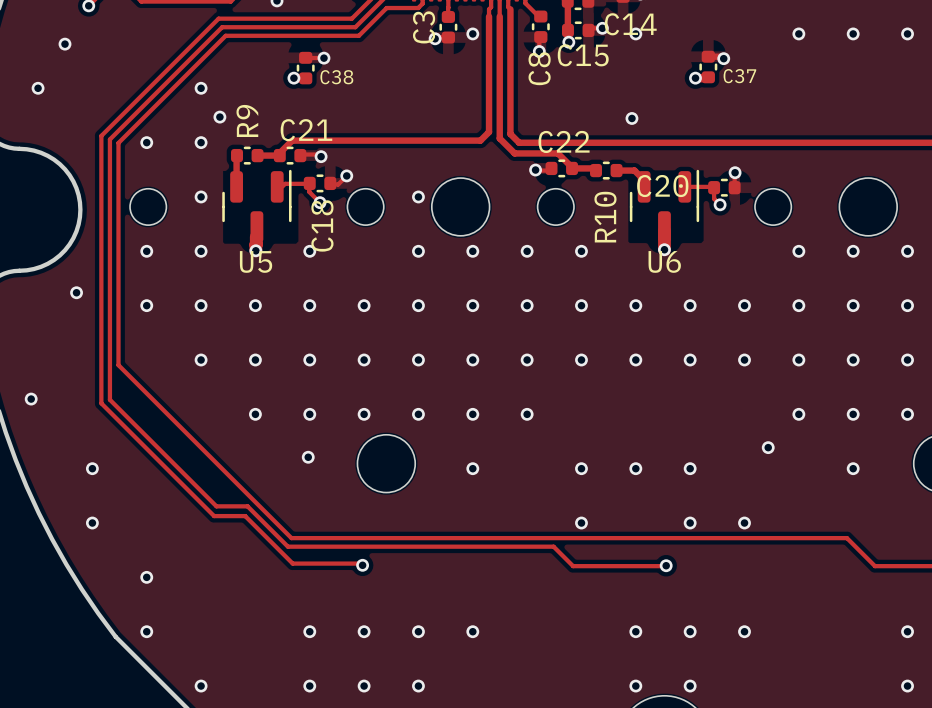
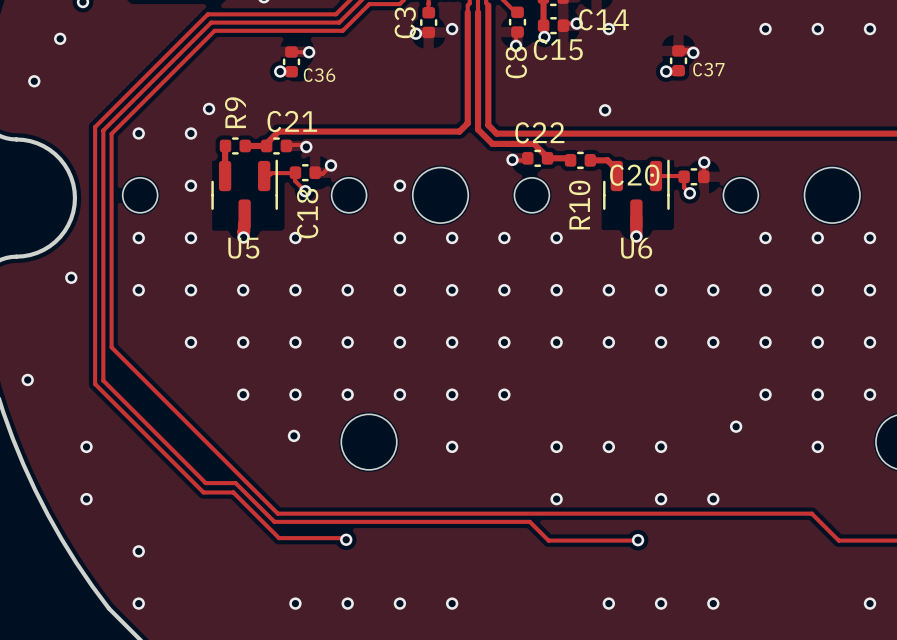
C38 name: C38 (336, 77) -> C36 (319, 75)
via: (201, 88) -> none

